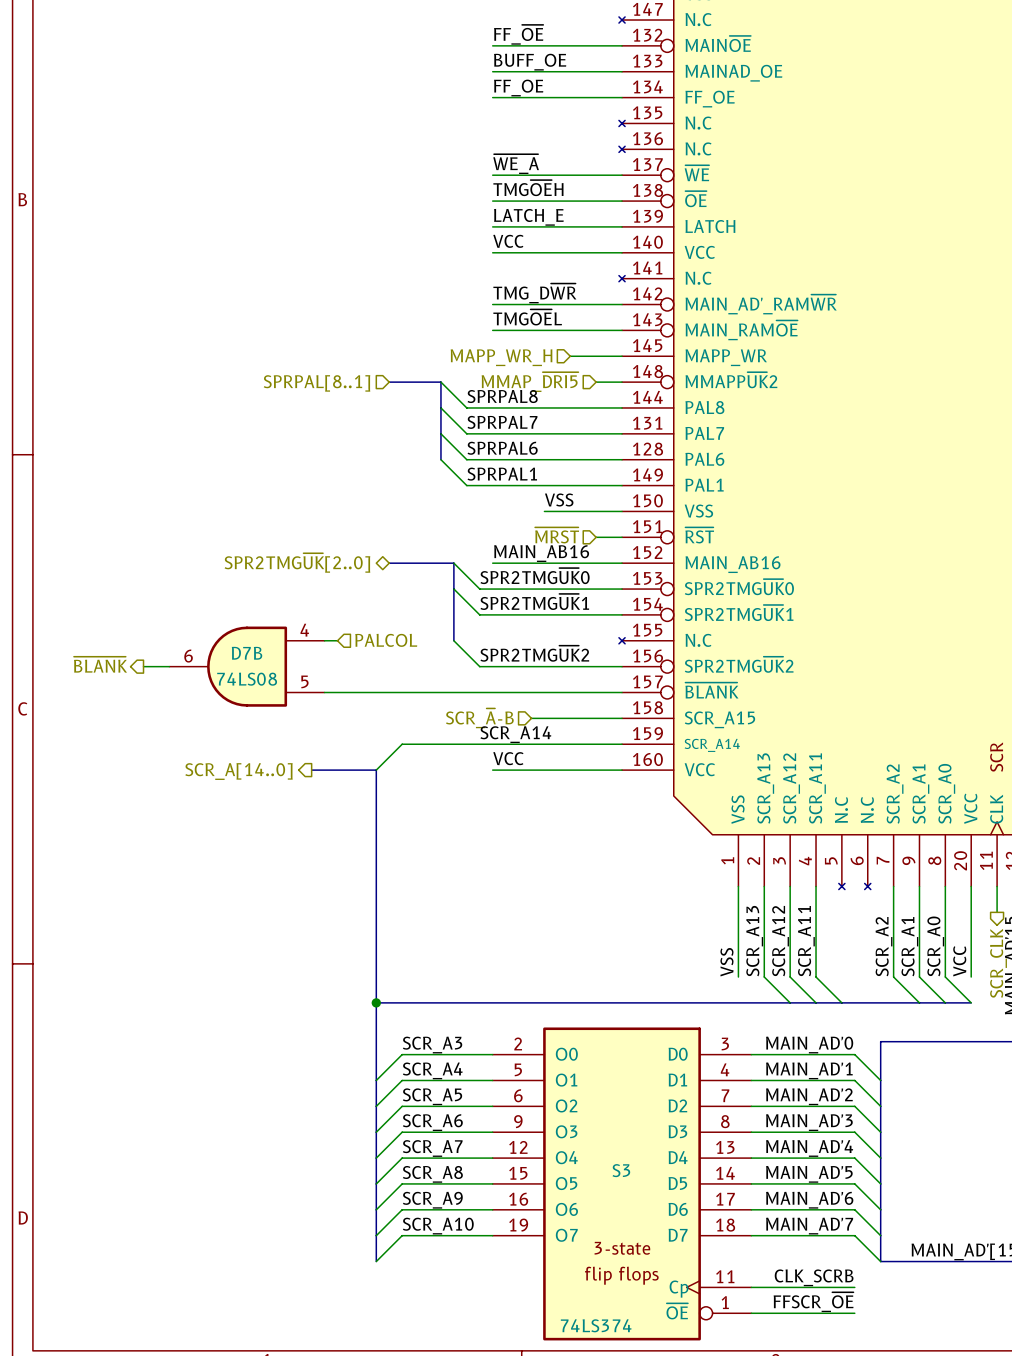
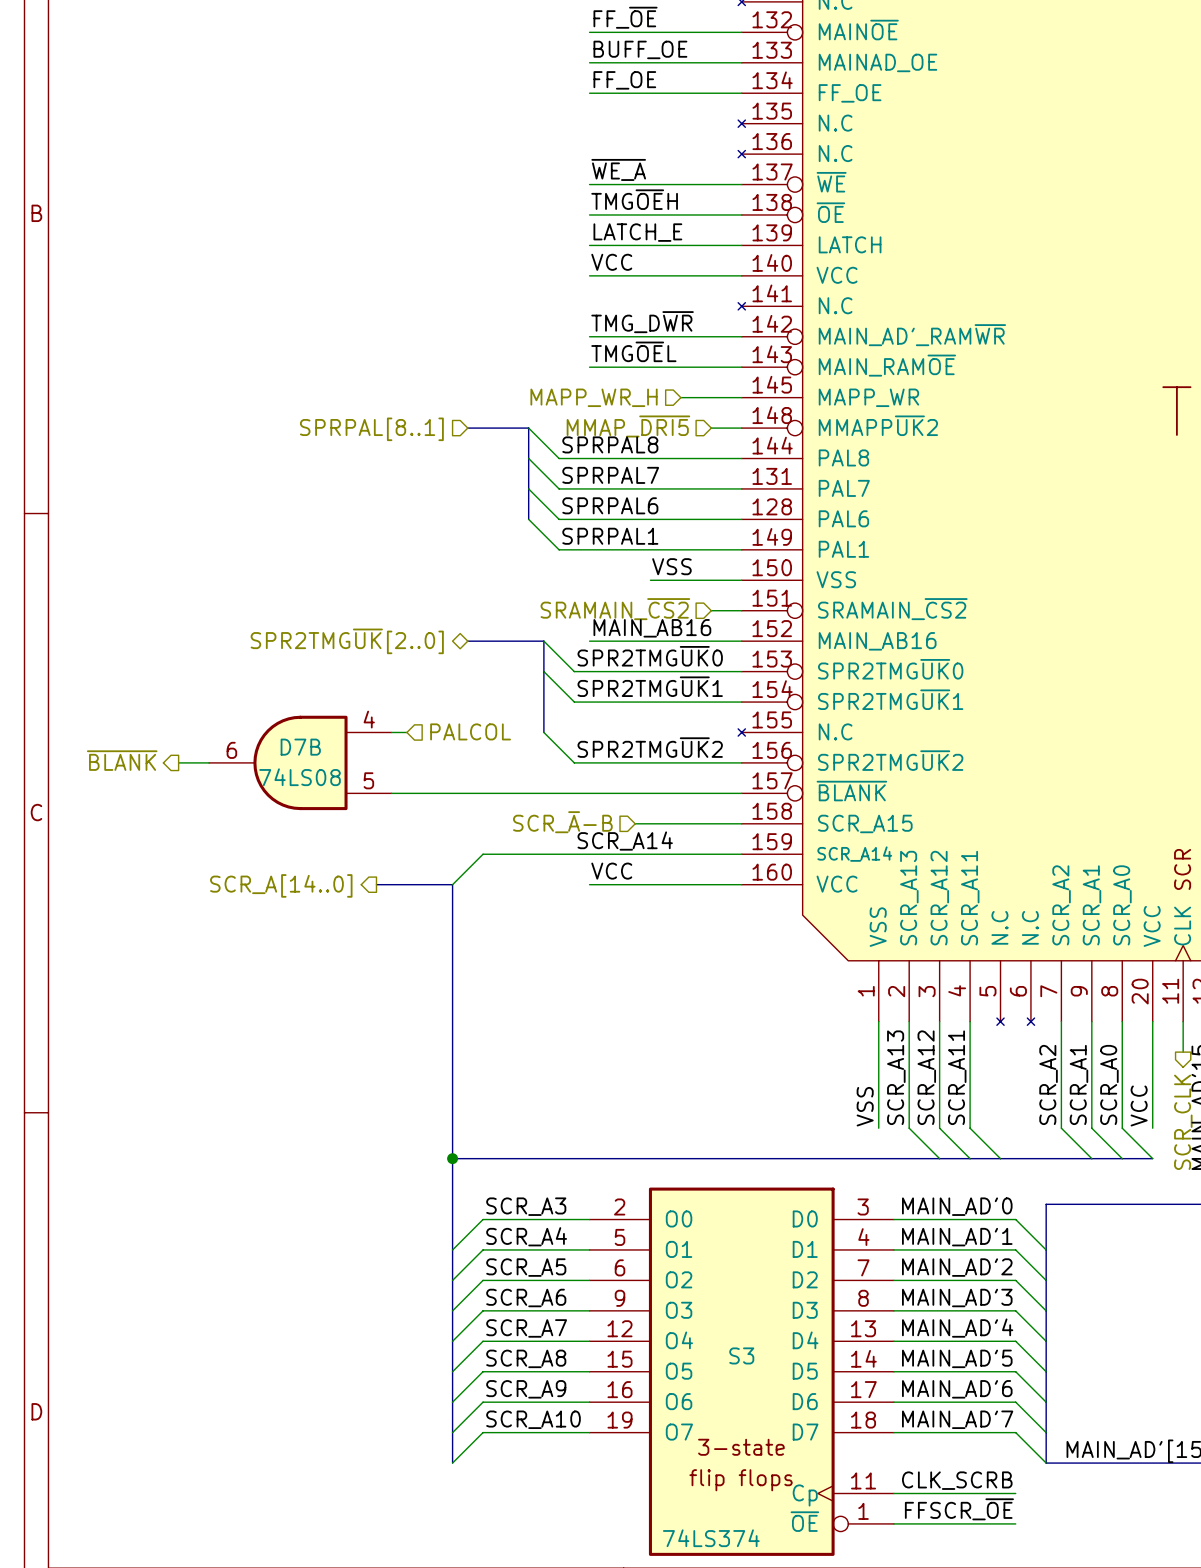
hierarchical label: ~{MRST} (557, 535) -> SRAMAIN_~{CS2} (615, 609)
part pin name: ~{RST} (699, 535) -> SRAMAIN_~{CS2} (892, 609)

